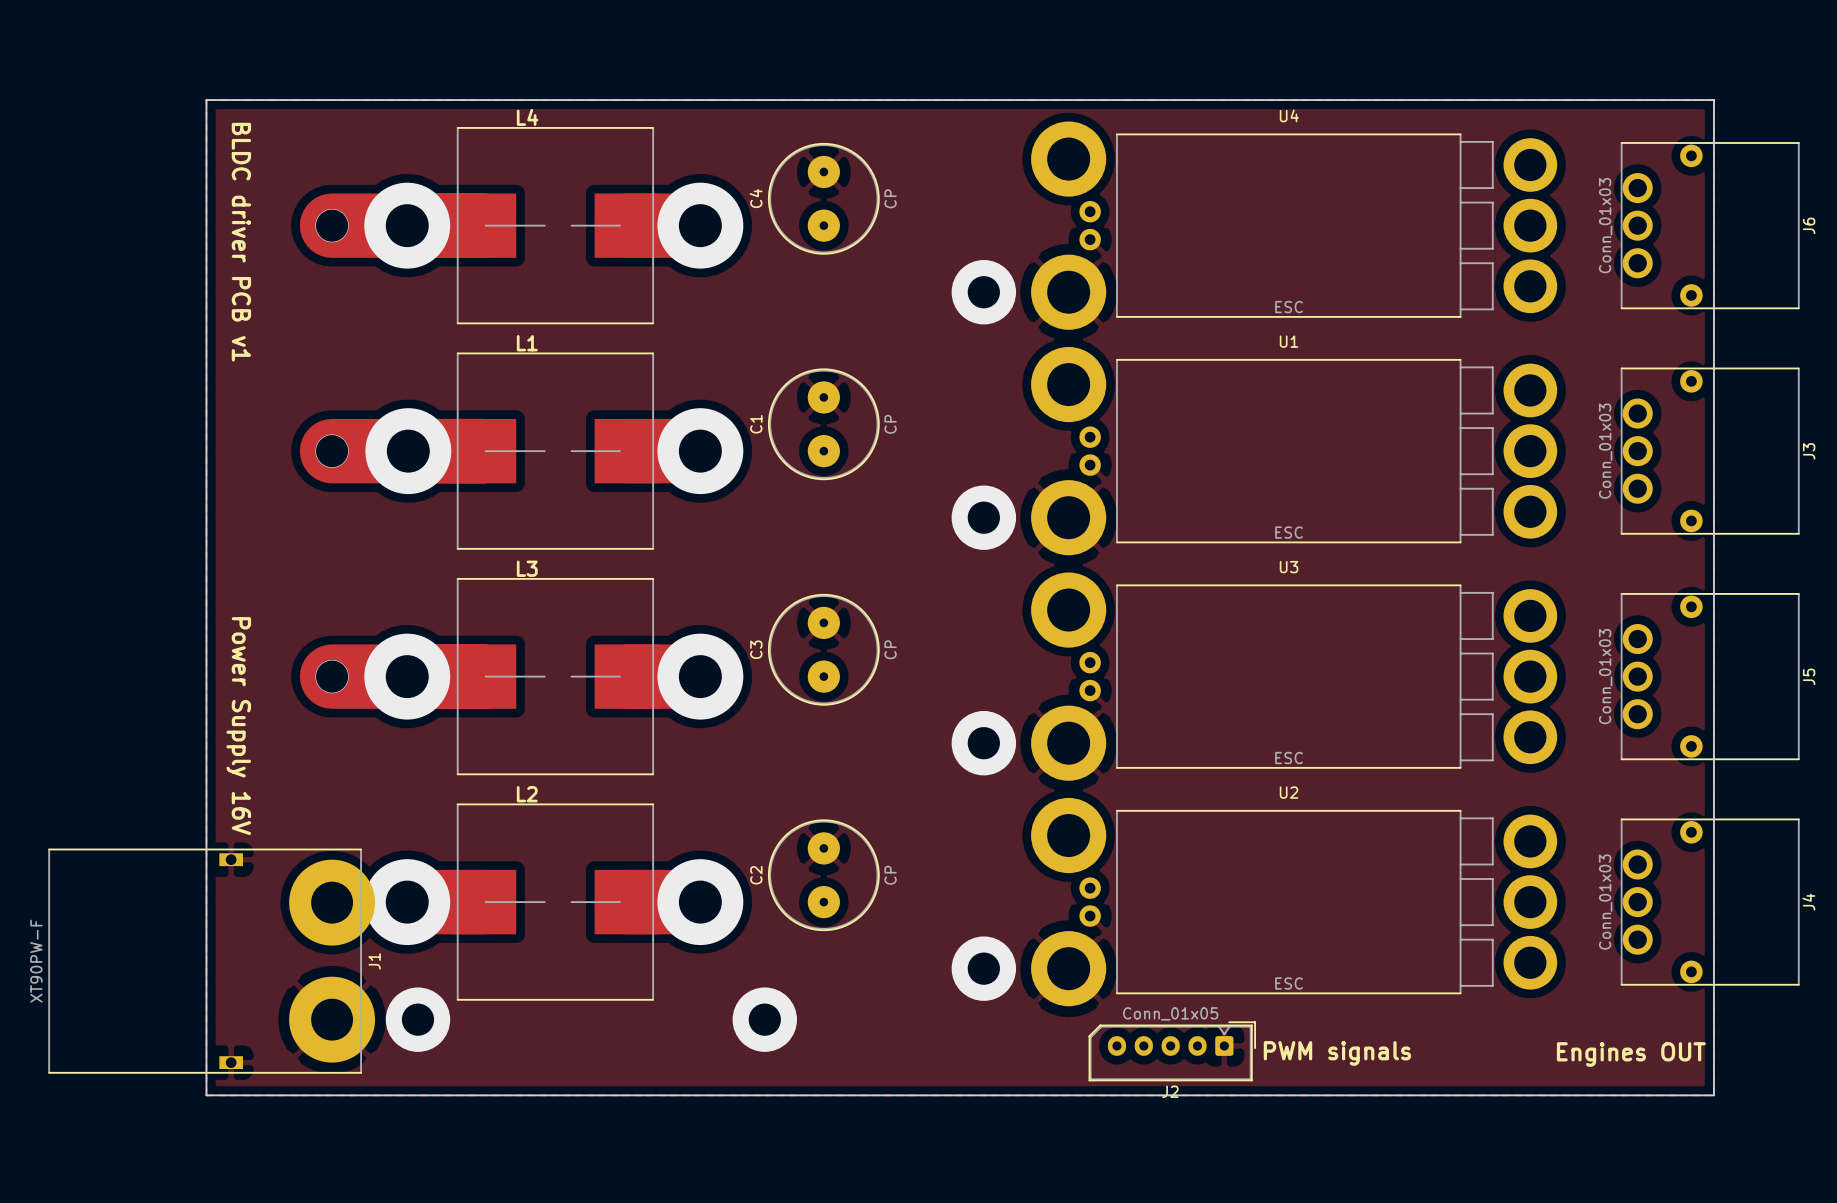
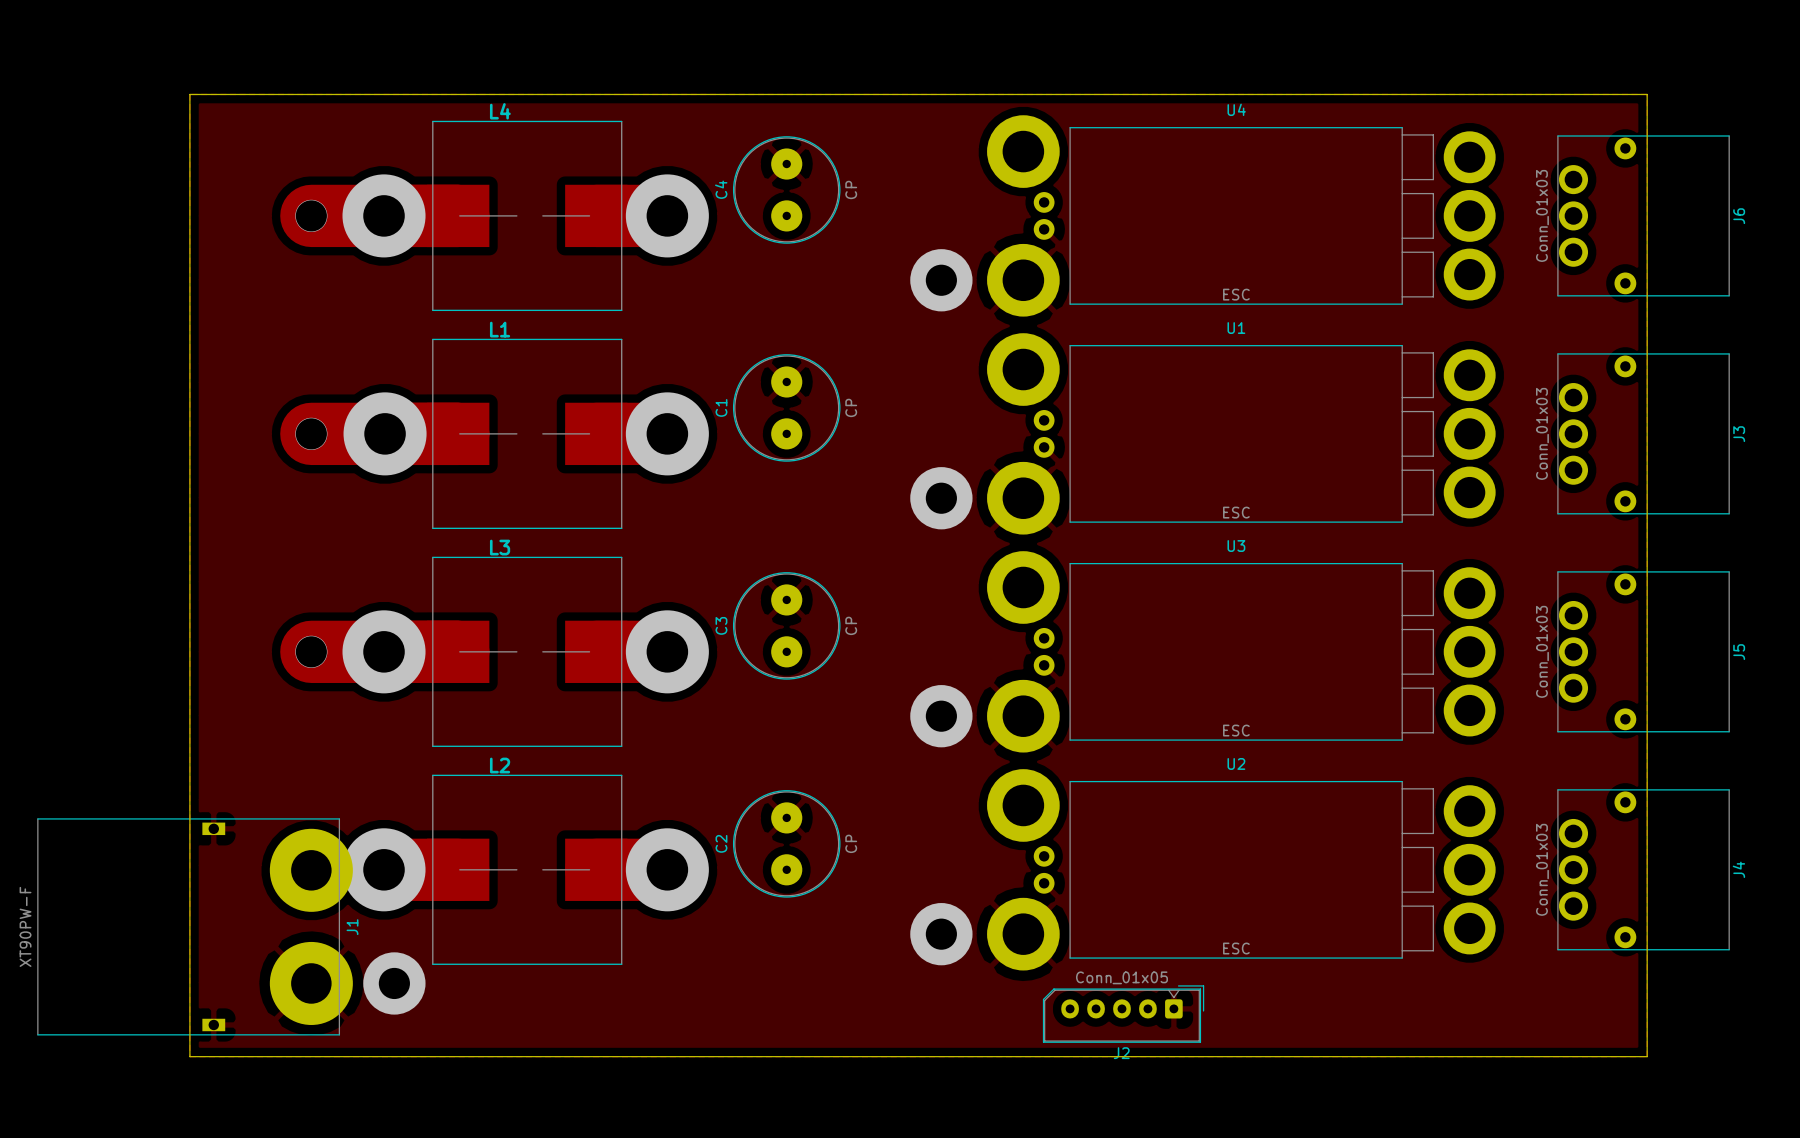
text: BLDC driver PCB v1 (241, 242) -> none
text: Power Supply 16V (238, 726) -> none
via: (764, 1019) -> none
text: PWM signals (1337, 1053) -> none
text: Engines OUT (1631, 1054) -> none

